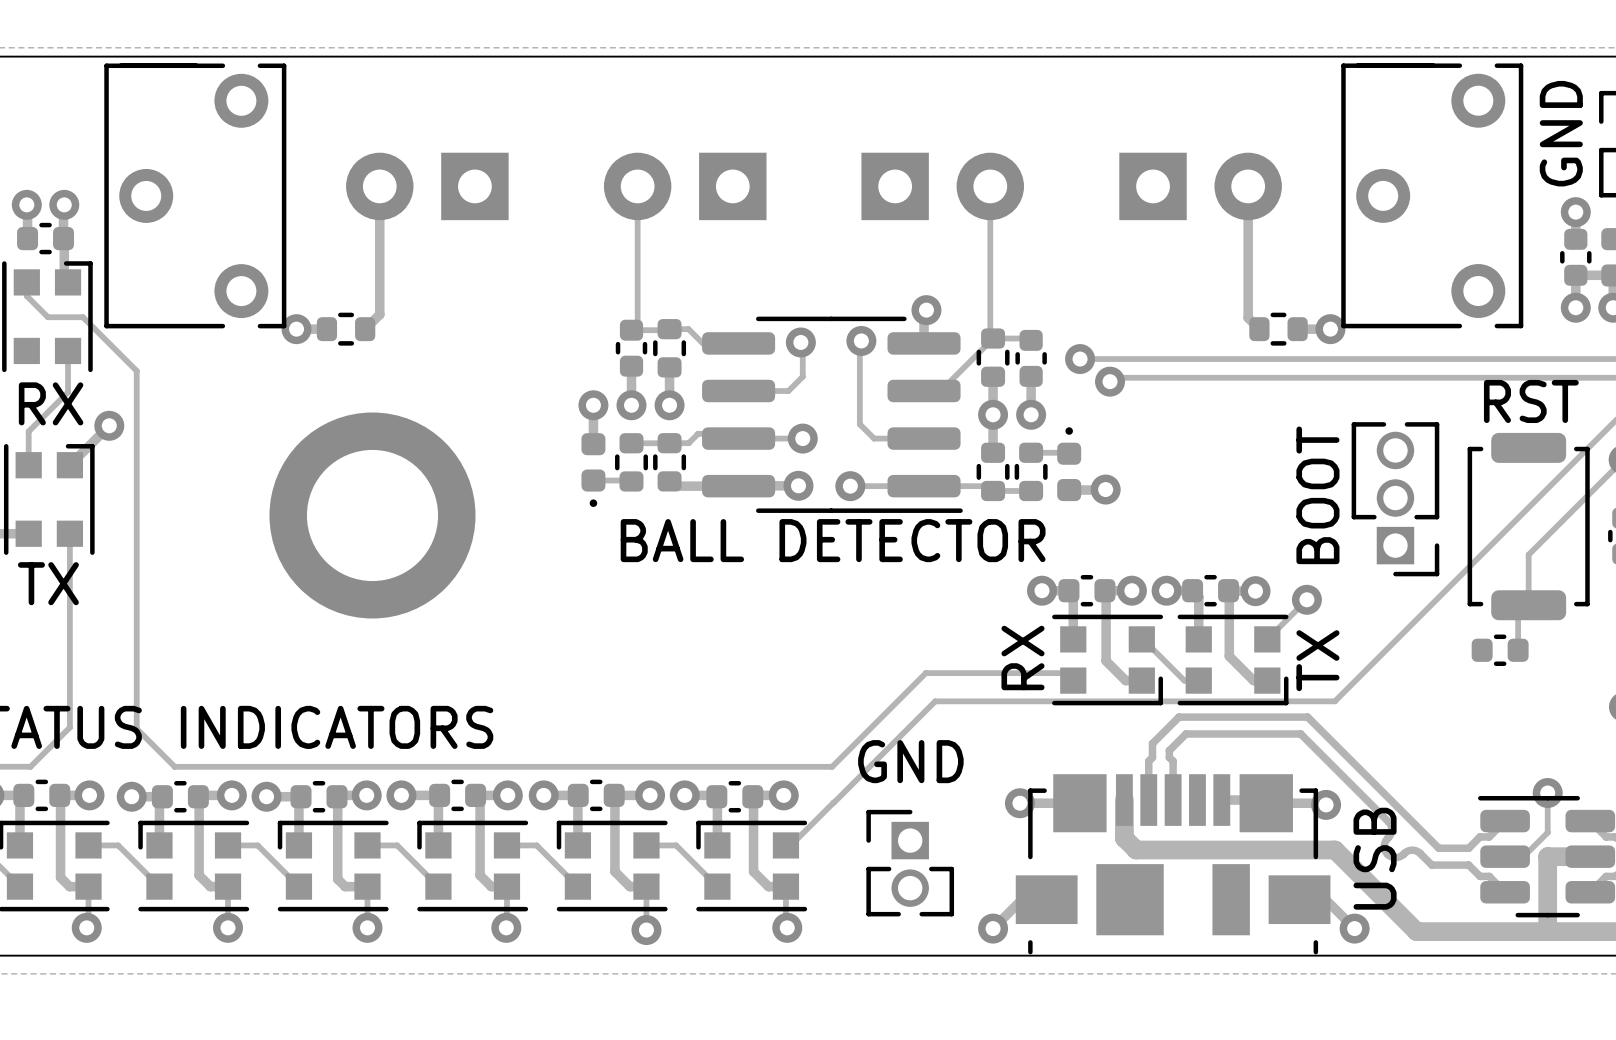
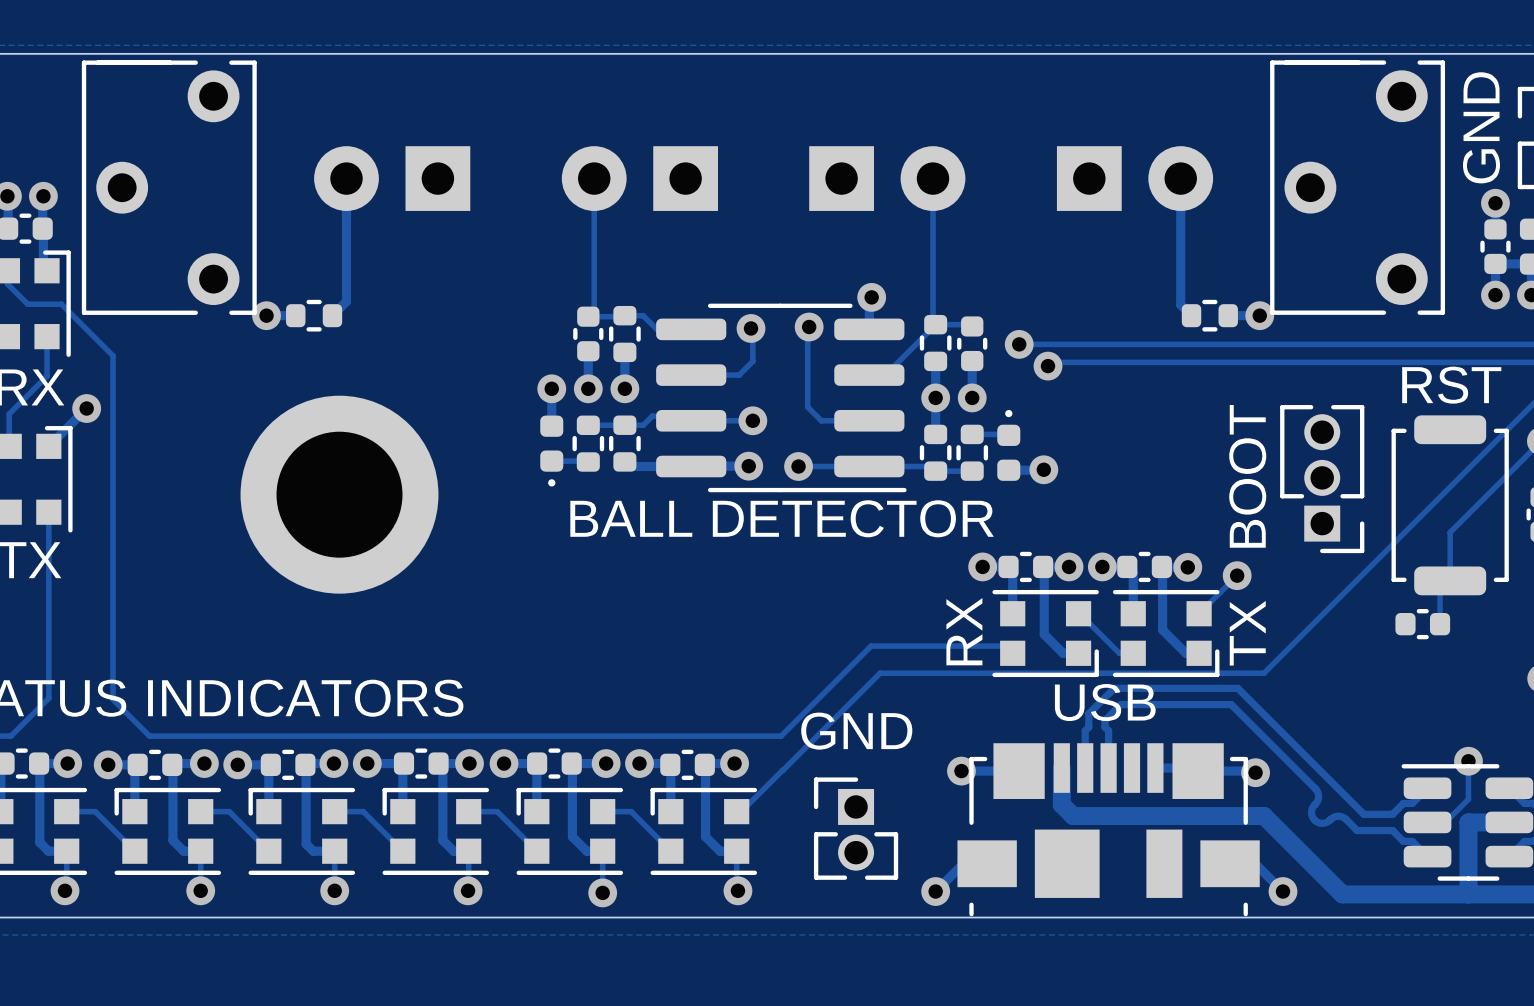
text rotation: 0° (1375, 858) -> 90° clockwise (1105, 702)
text position: USB (1375, 858) -> USB (1105, 702)

